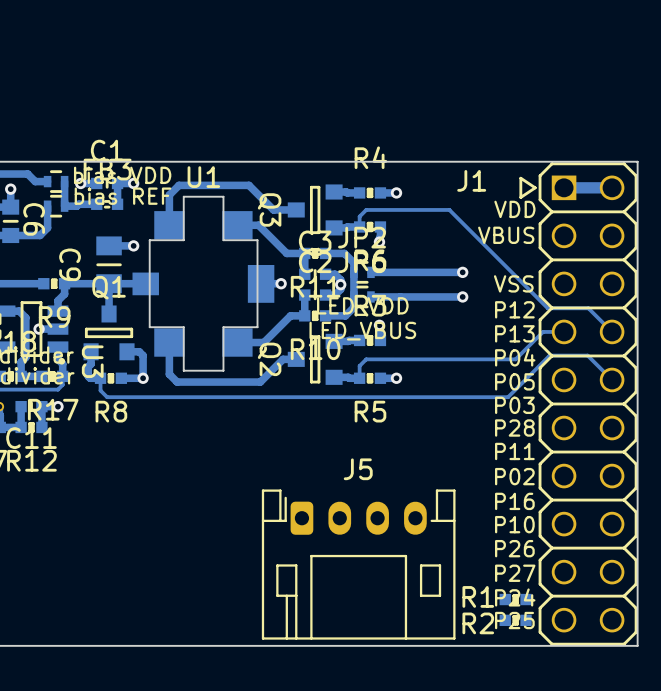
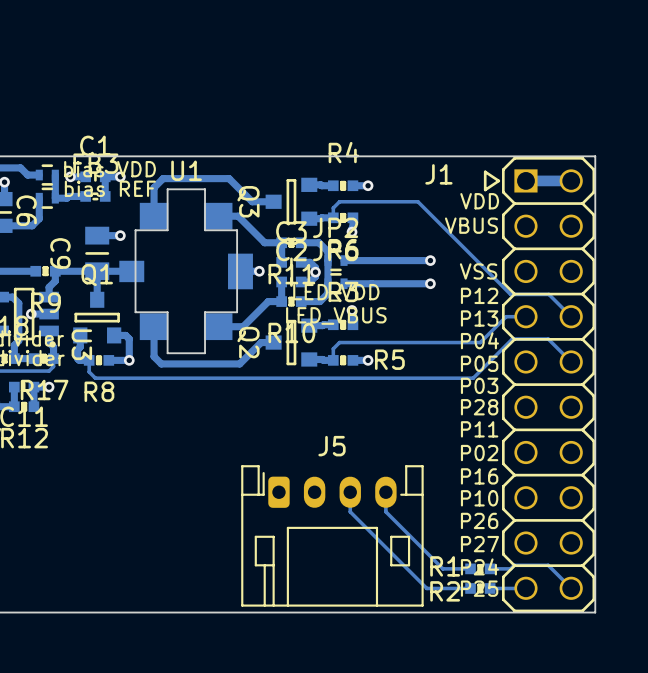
R5 name position: R5 (370, 411) -> R5 (389, 359)
track: none -> (350, 492) (350, 511) (426, 588) (470, 588)
track: none -> (385, 492) (385, 511) (442, 568) (470, 568)
track: none -> (490, 568) (510, 568) (514, 565) (548, 565) (571, 588)
track: none -> (525, 588) (490, 588)

